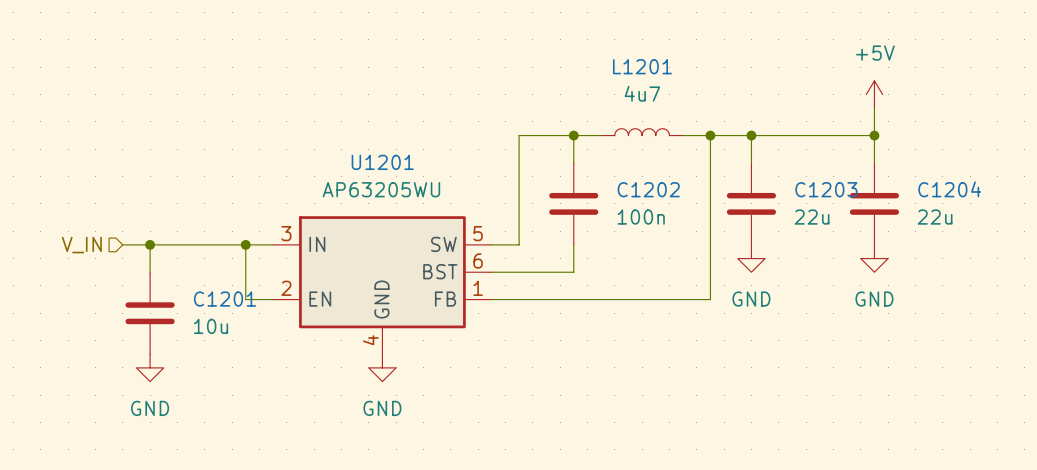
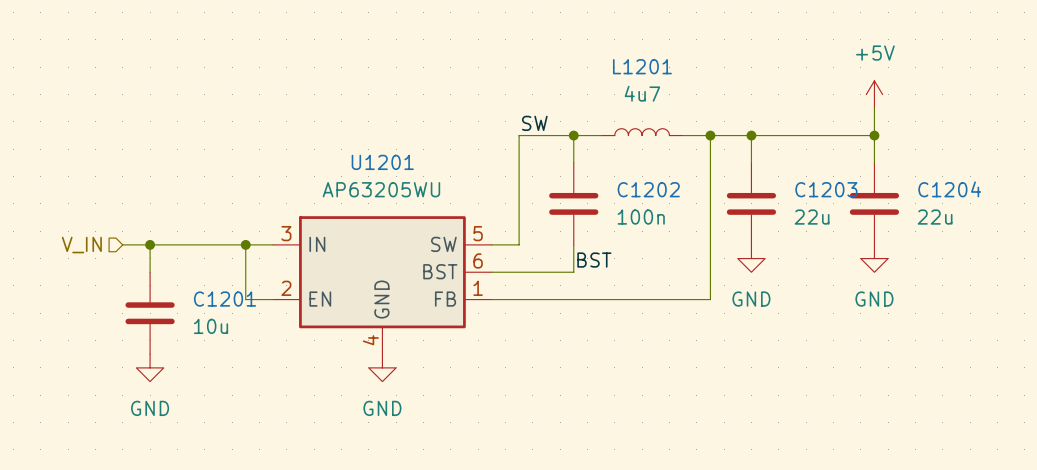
label: none -> SW (534, 123)
label: none -> BST (594, 260)

